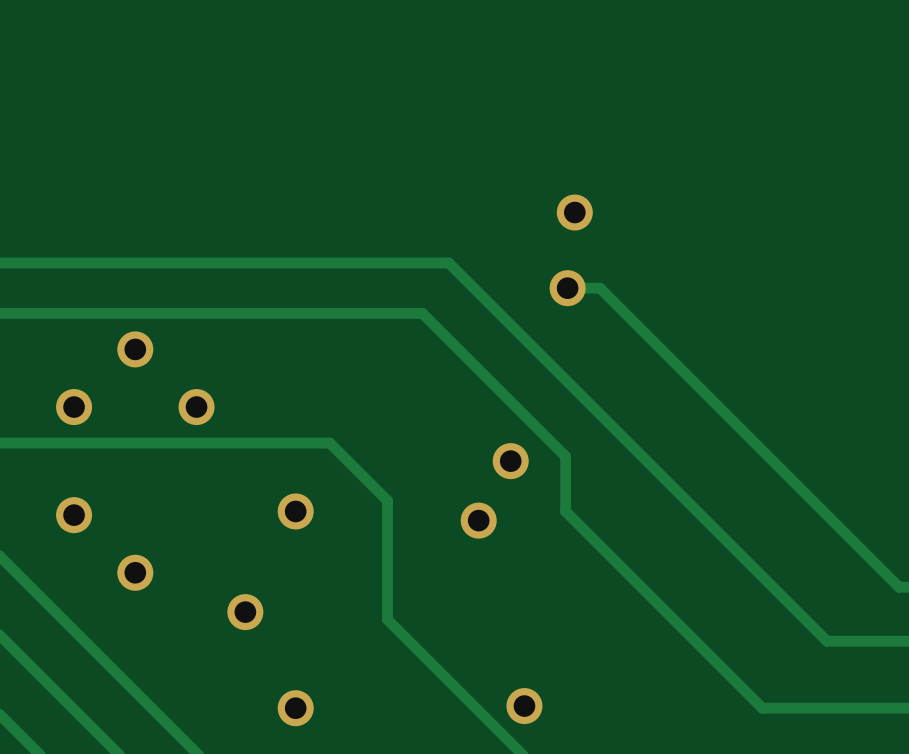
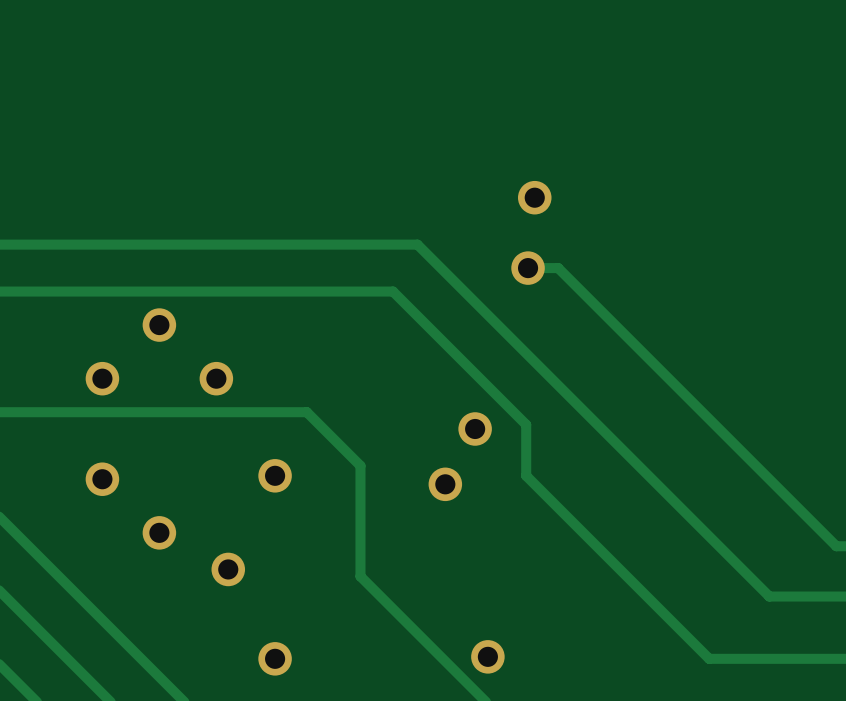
via position: (135, 349) -> (159, 325)
via position: (74, 407) -> (102, 378)
via position: (196, 407) -> (216, 378)
via position: (74, 515) -> (102, 479)
via position: (135, 572) -> (159, 532)

